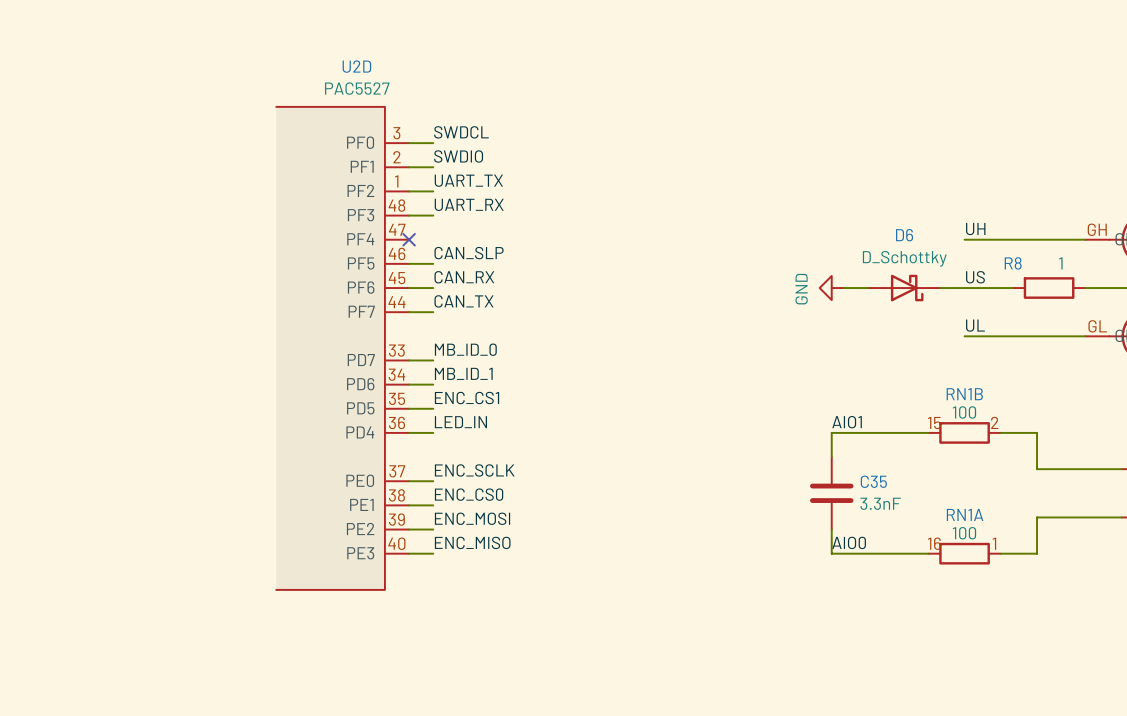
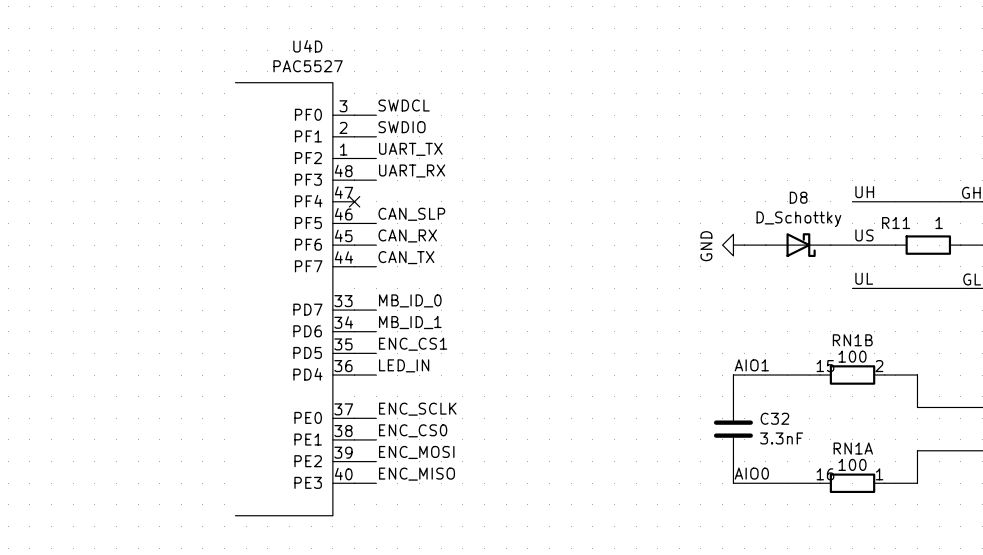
U2D name: U2D (356, 66) -> U4D (307, 46)
D6 name: D6 (904, 235) -> D8 (798, 197)
R8 name: R8 (1013, 263) -> R11 (896, 223)
C35 name: C35 (873, 481) -> C32 (774, 418)

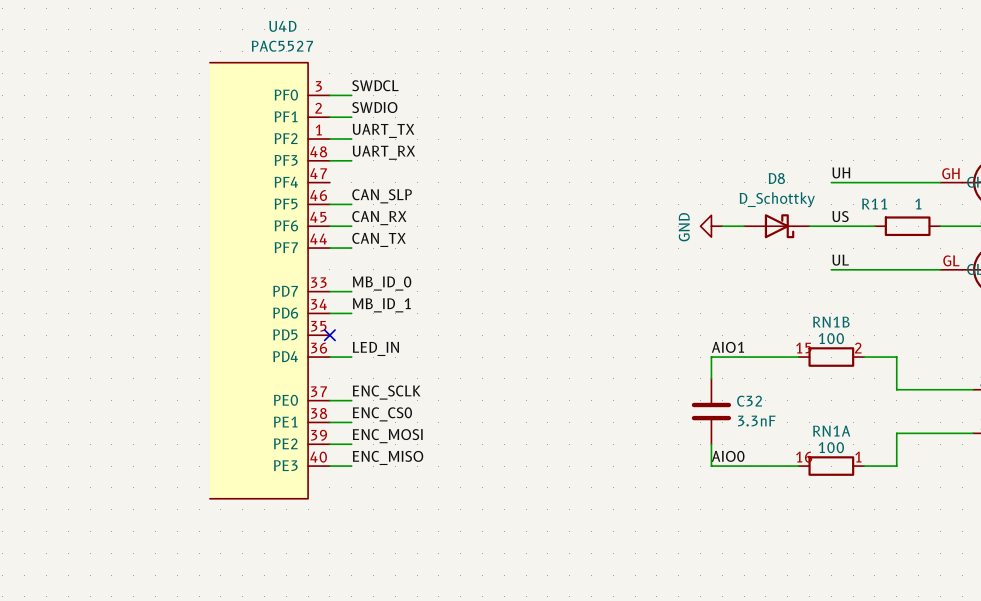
no-connect mark: (354, 201) -> none
label: ENC_CS1 (413, 344) -> none
wire: (354, 353) (376, 353) -> none
no-connect mark: none -> (329, 335)

